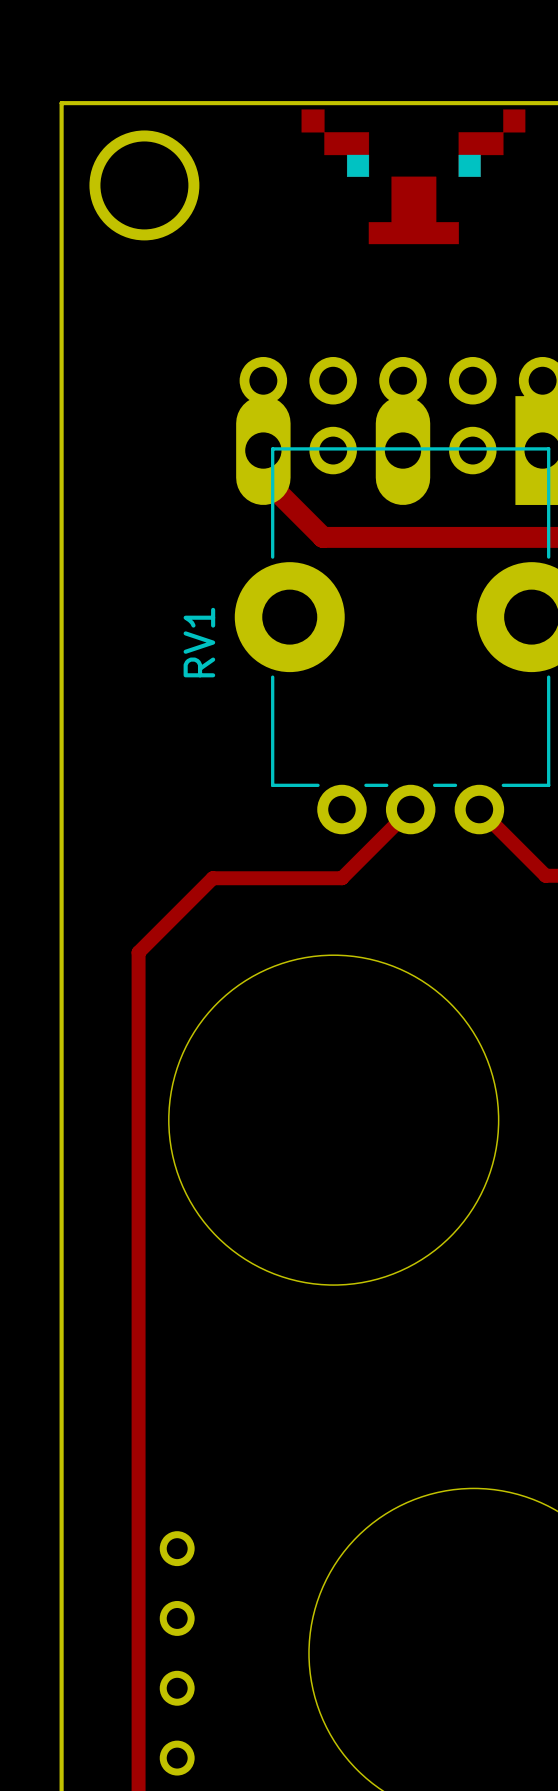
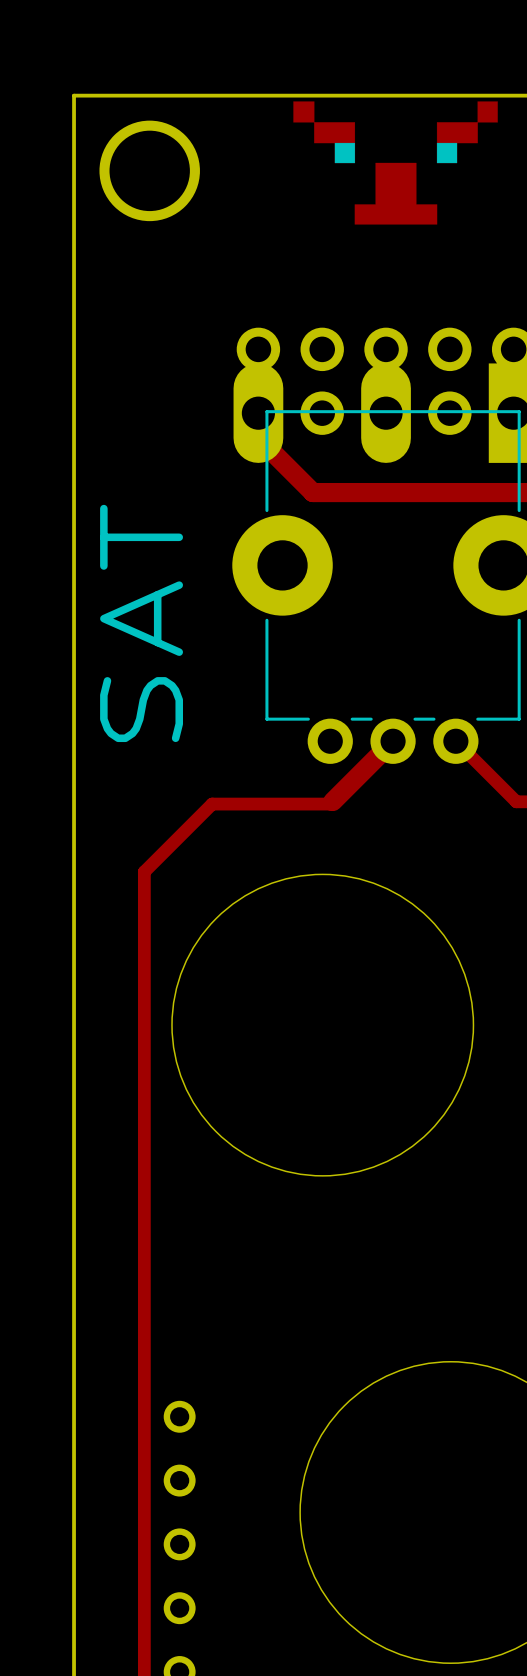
RV1 name: RV1 (199, 642) -> none
text: none -> SAT (141, 623)
track width: thin (410, 809) (344, 875) -> thick (393, 741) (332, 801)

